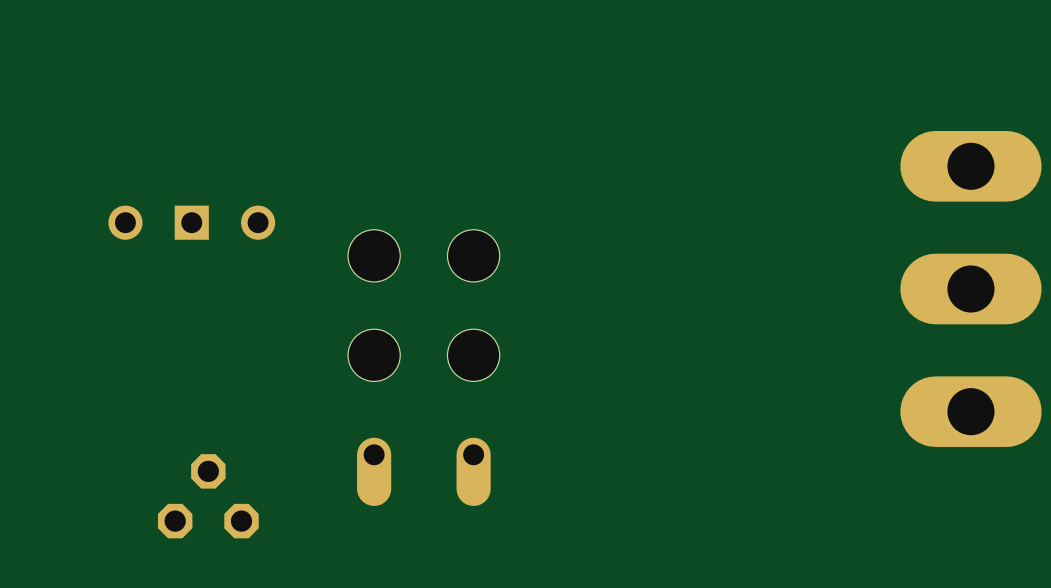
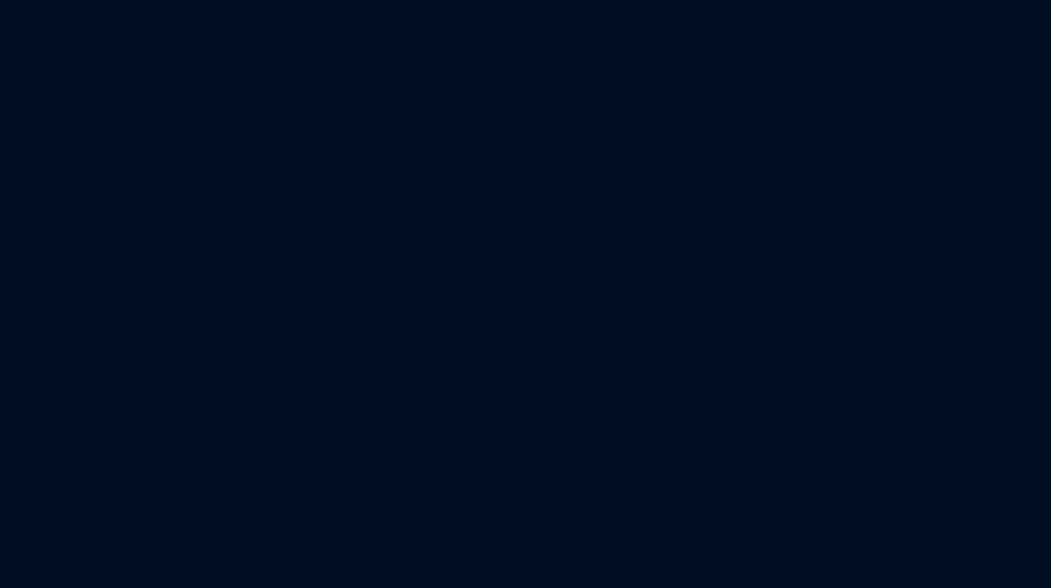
part: (191, 222) -> none
part: (970, 288) -> none
part: (423, 367) -> none
part: (208, 496) -> none

